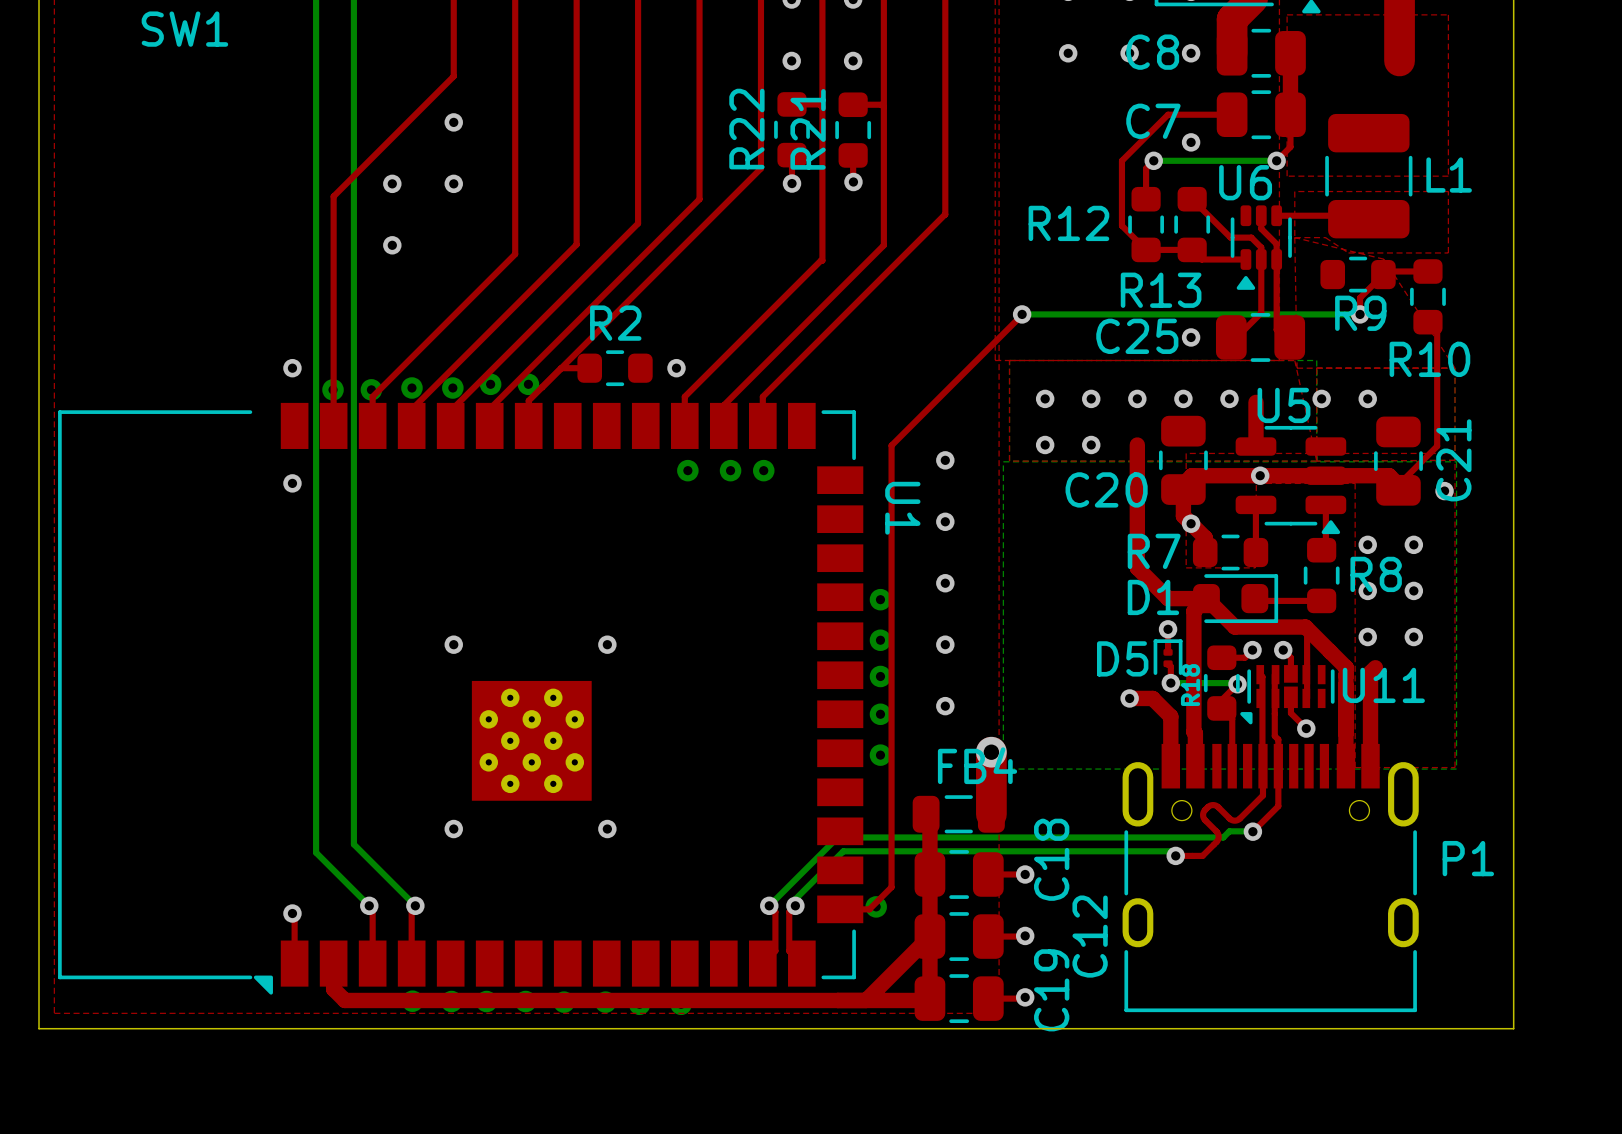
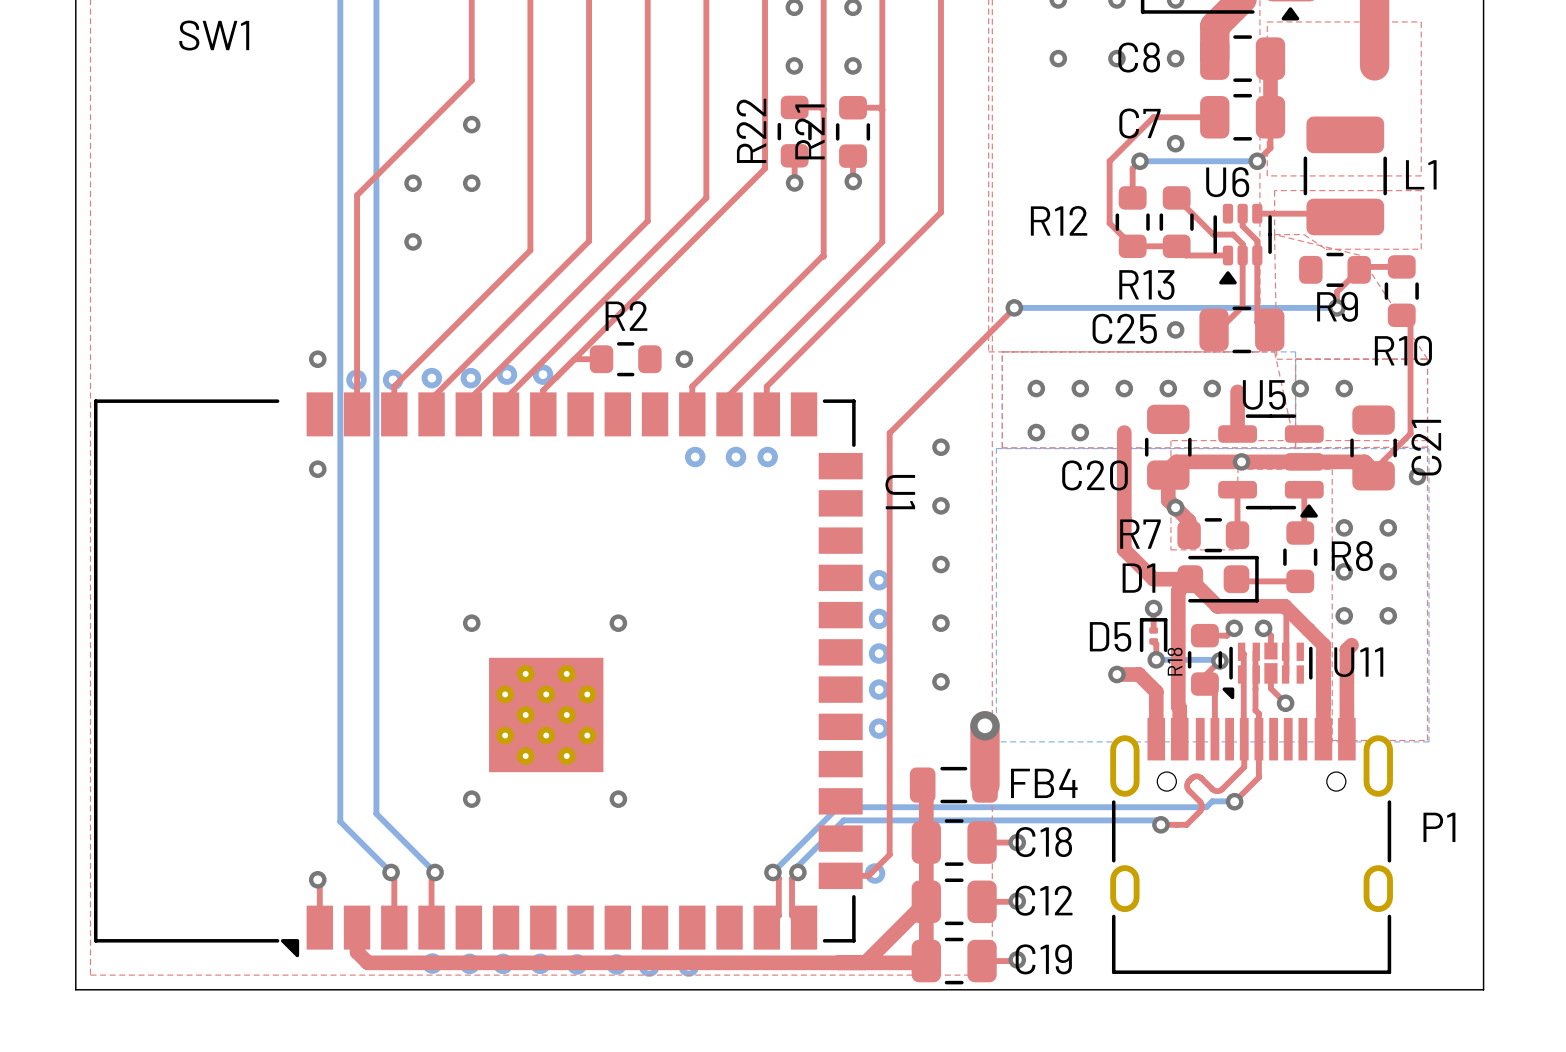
FB4 name position: FB4 (977, 765) -> FB4 (1044, 783)
C18 name rotation: 0° (1051, 859) -> 90° clockwise (1043, 842)
C12 name rotation: 0° (1090, 936) -> 90° clockwise (1043, 900)
C19 name rotation: 0° (1051, 990) -> 90° clockwise (1043, 959)

